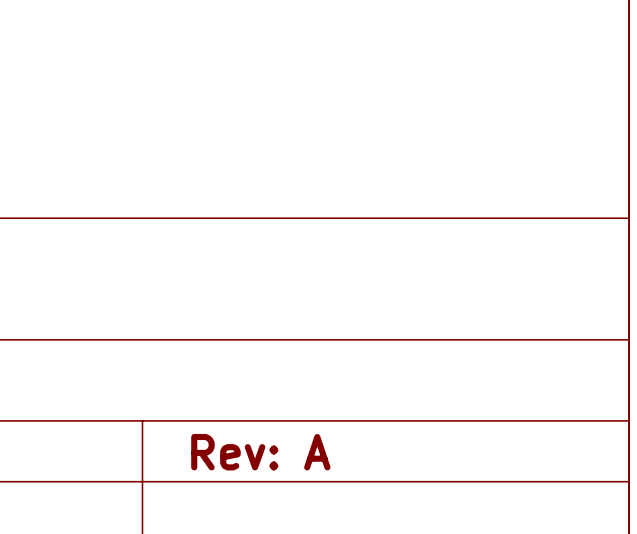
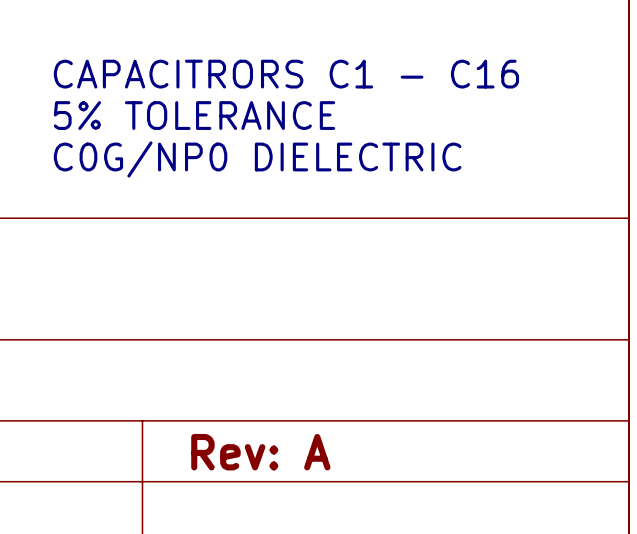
text: none -> CAPACITRORS C1 - C16 (286, 74)
text: none -> 5% TOLERANCE (194, 115)
text: none -> C0G/NP0 DIELECTRIC (257, 159)

